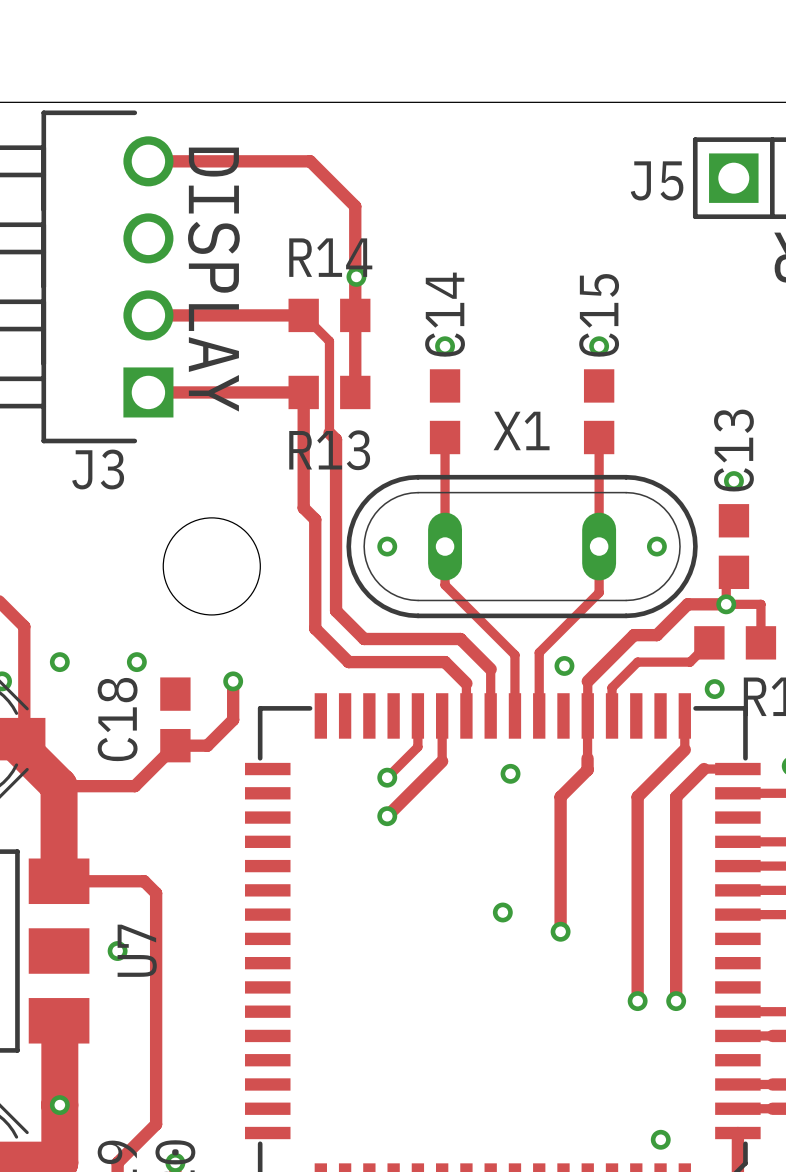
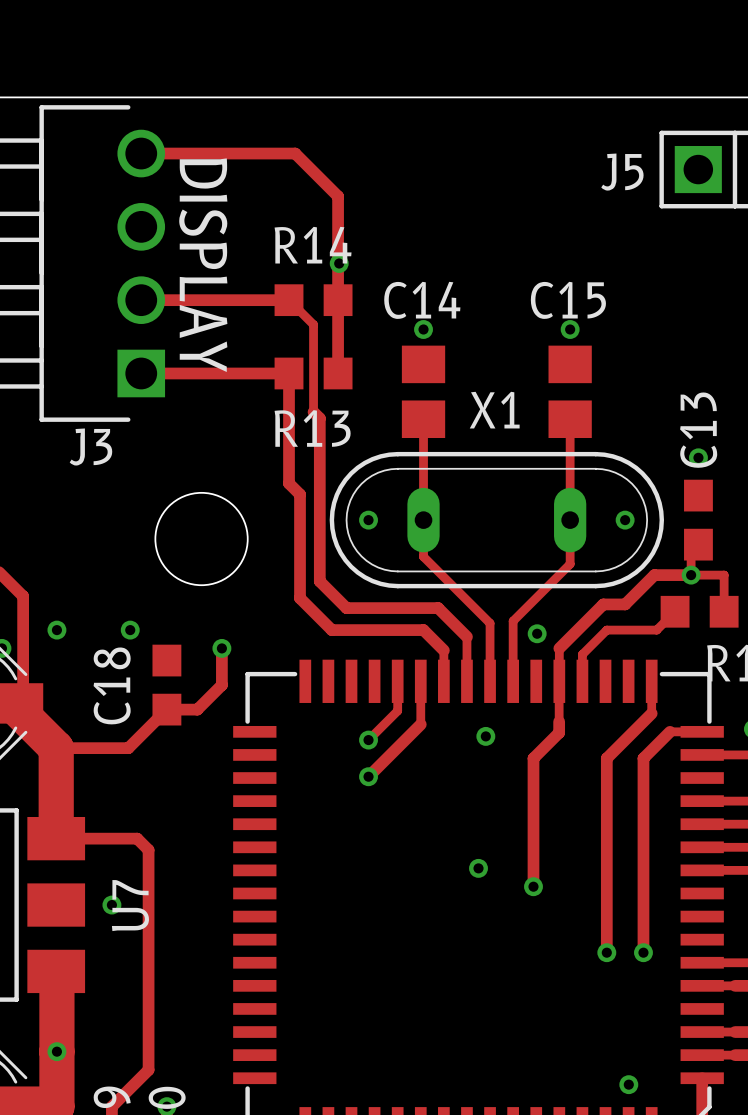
C14 name rotation: 0° (445, 314) -> 90° clockwise (422, 300)
C15 name rotation: 0° (599, 315) -> 90° clockwise (568, 300)
C14 footprint: [429, 369, 461, 455] -> [401, 345, 446, 439]
C15 footprint: [583, 369, 615, 455] -> [548, 345, 592, 439]
via: (714, 689) -> none

